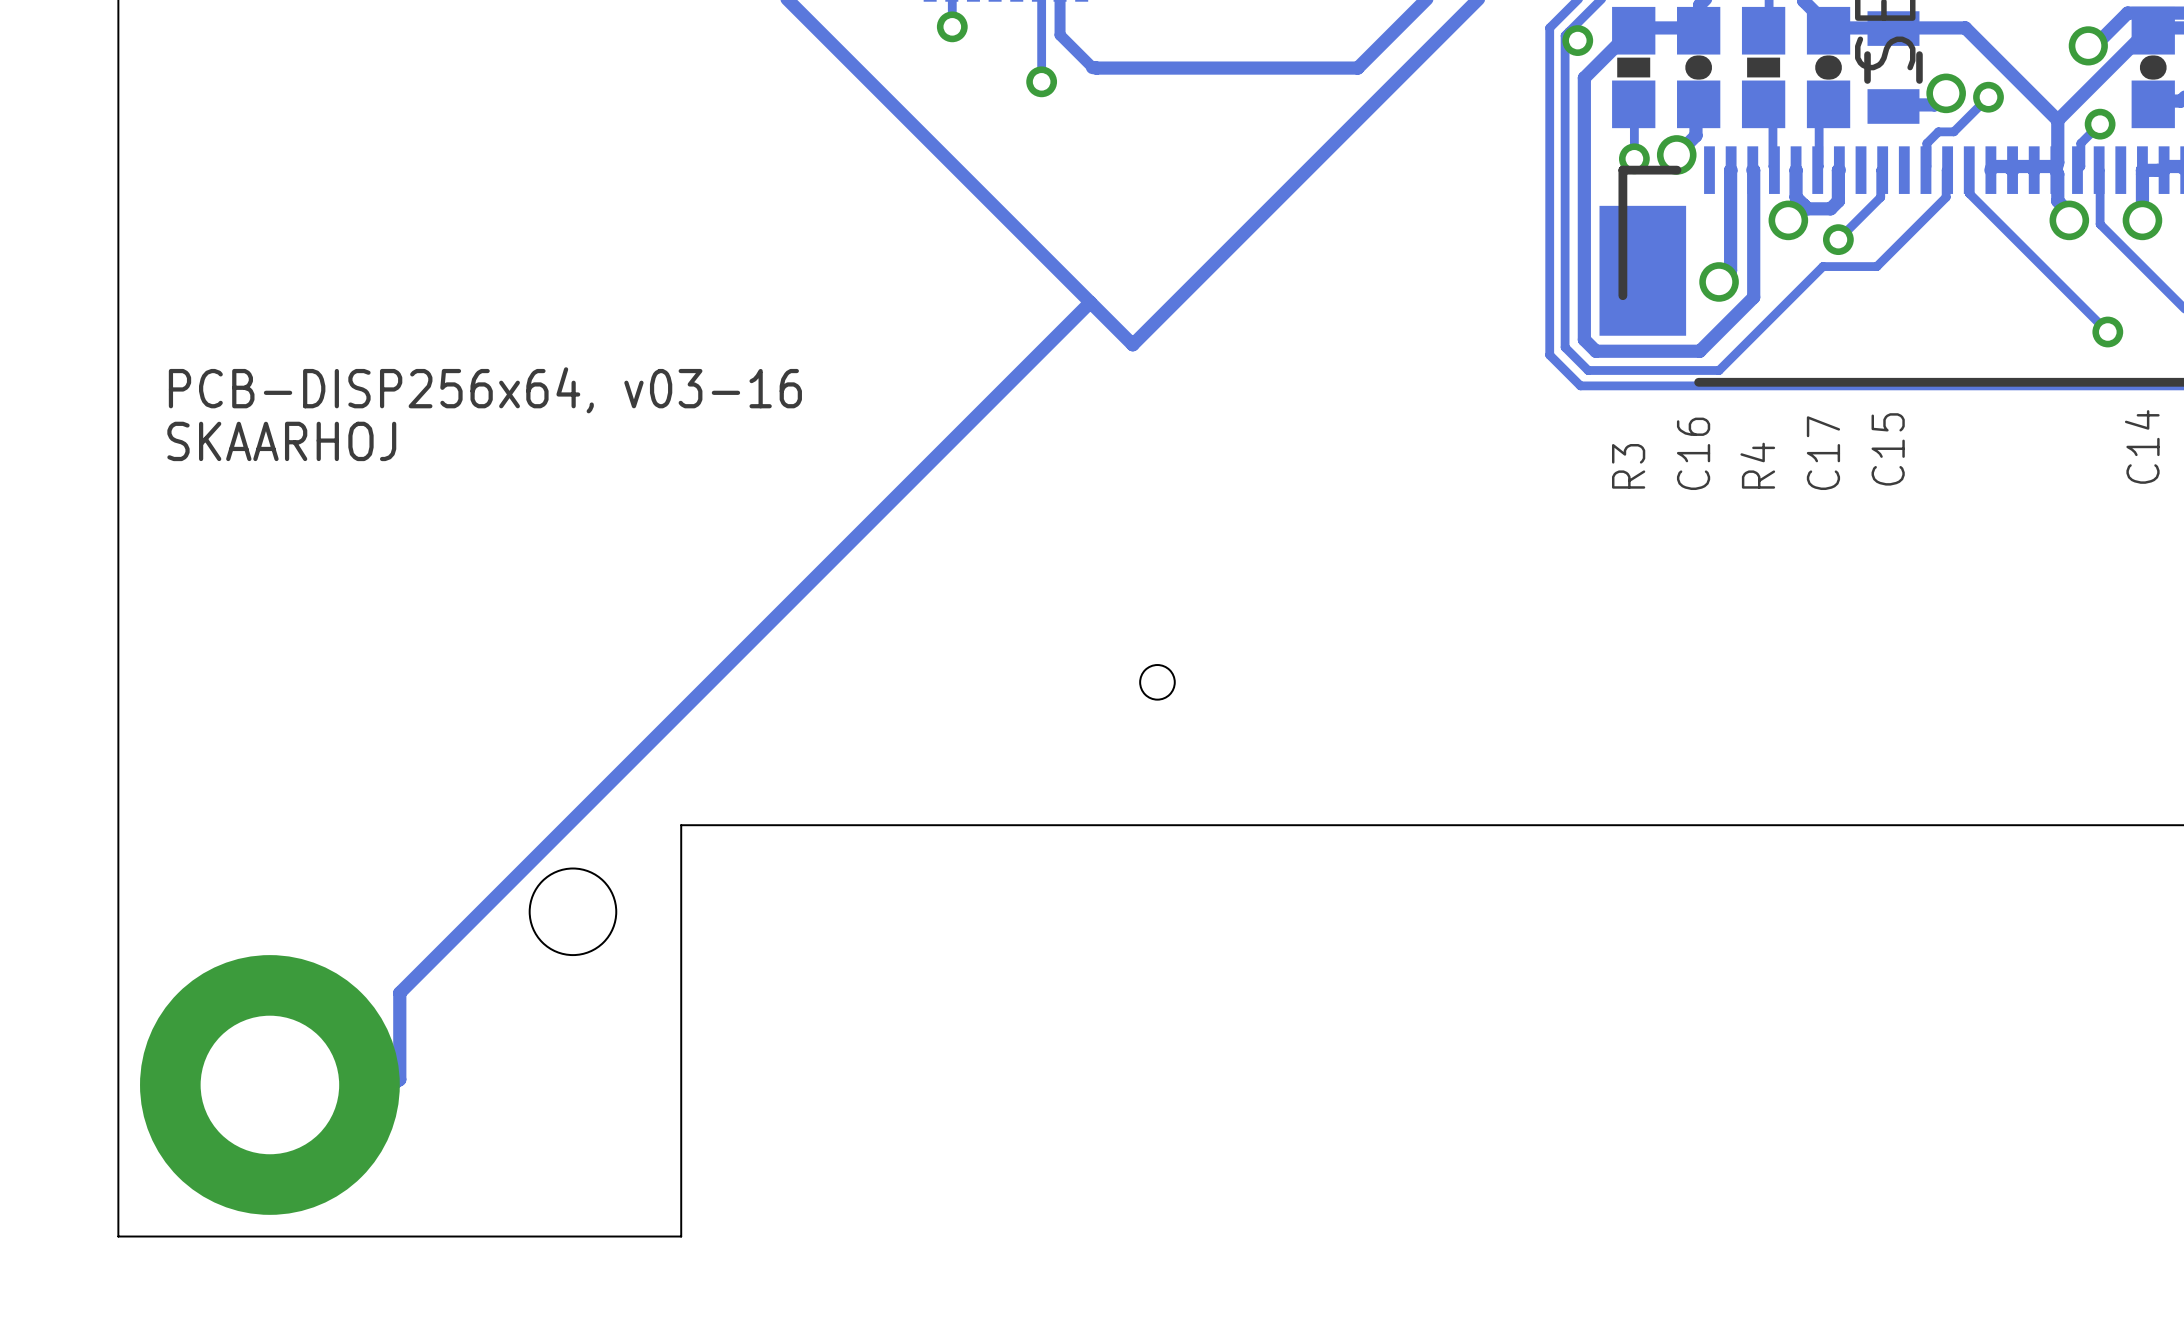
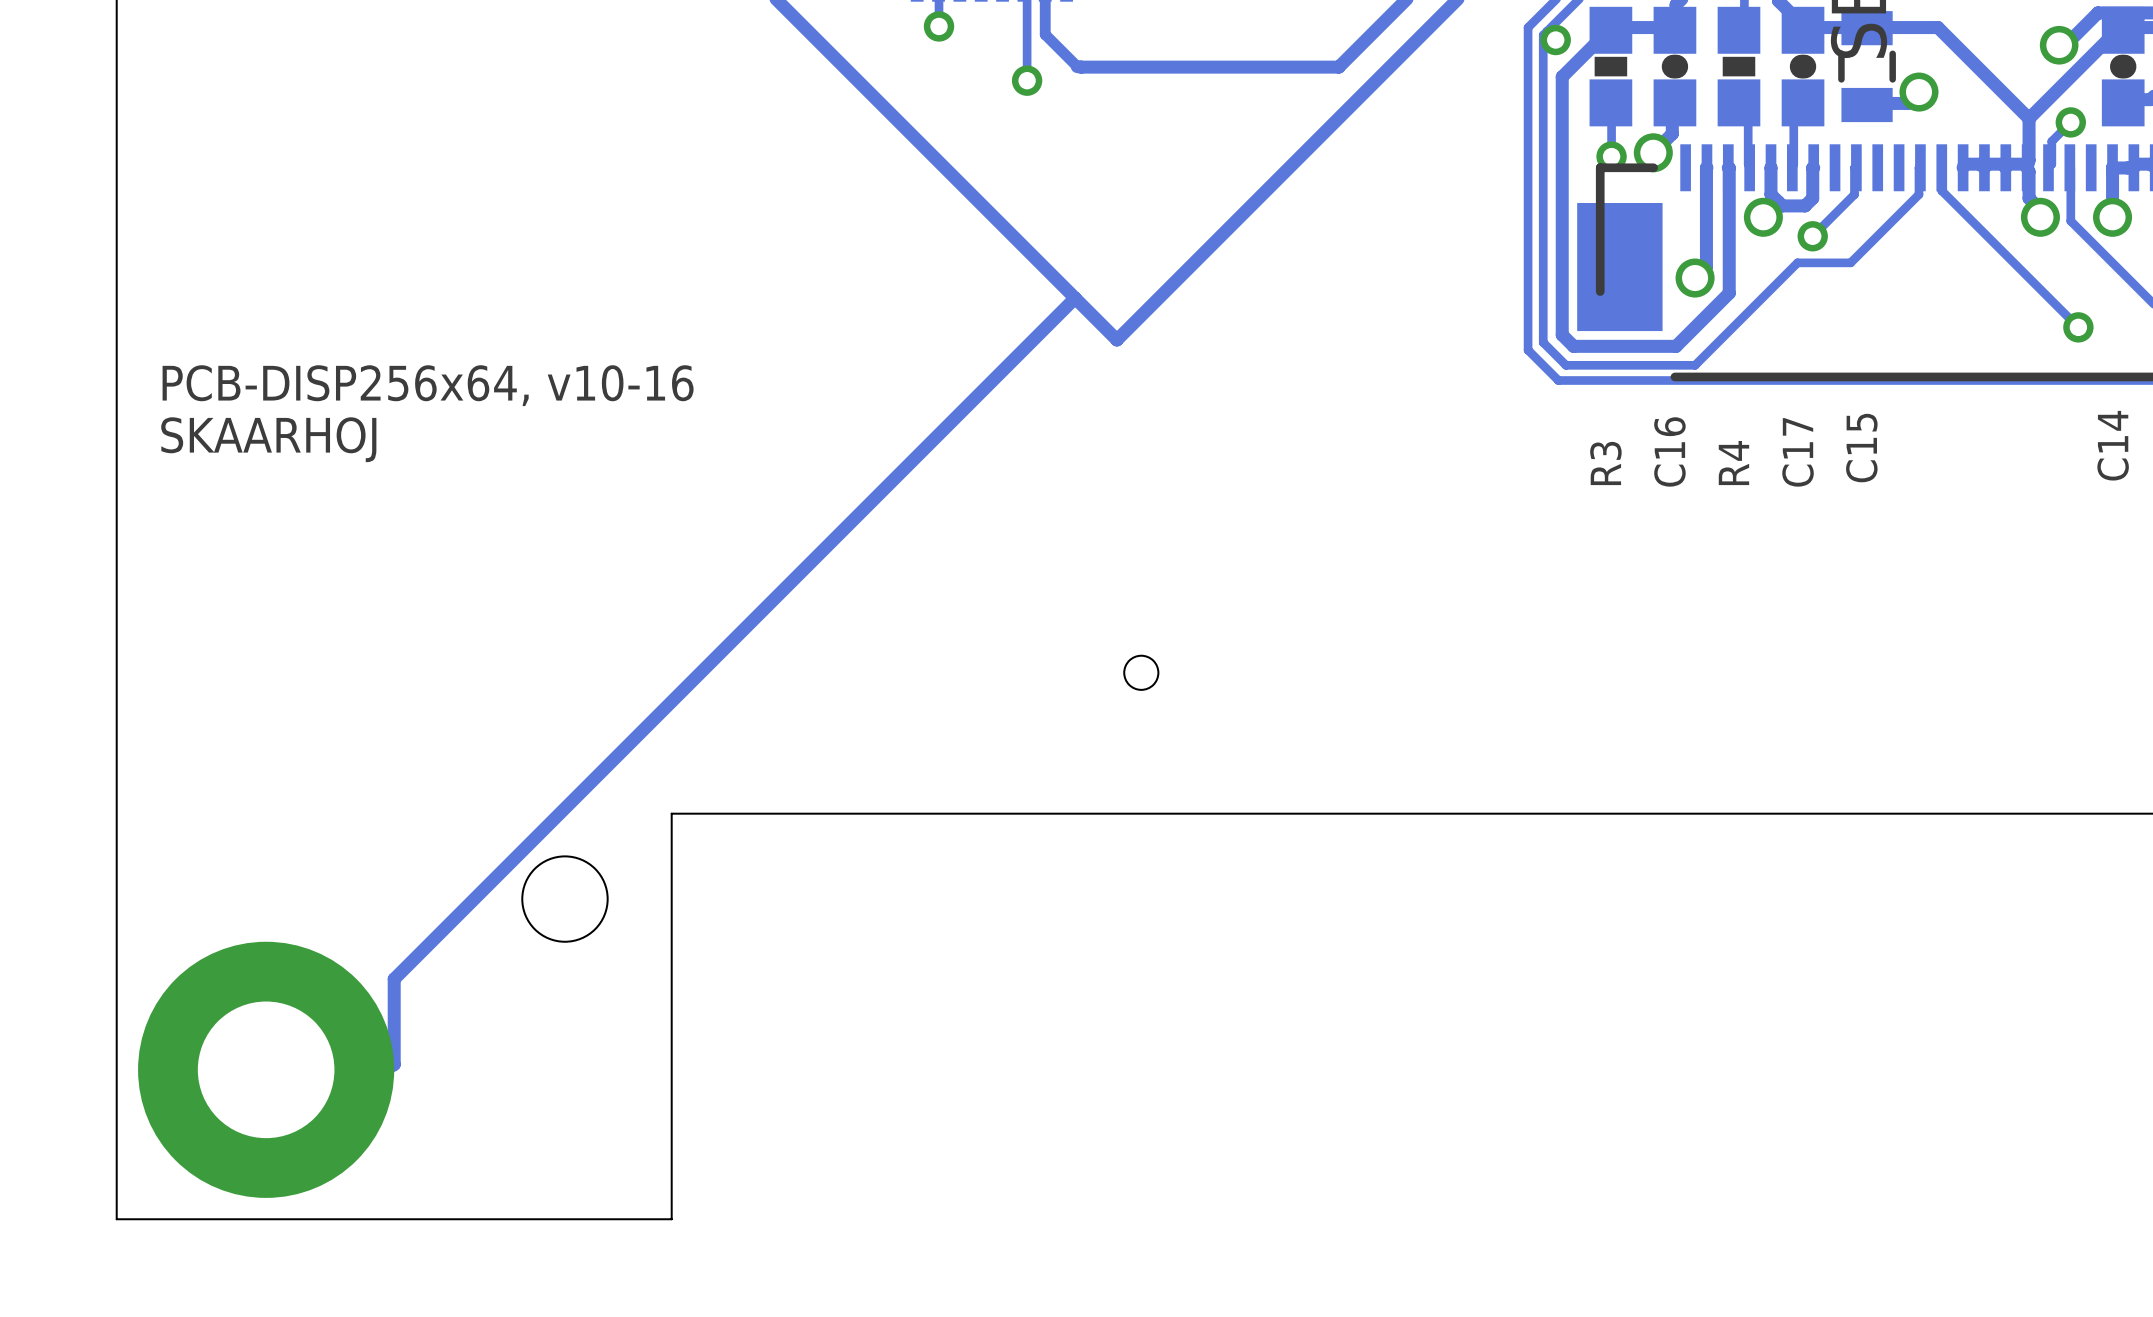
track: (1988, 97) (1953, 131) (1938, 131) (1926, 143) (1925, 170) -> none
via: (1988, 97) -> none
text: PCB-DISP256x64, v03-16 (485, 390) -> PCB-DISP256x64, v10-16 (428, 385)

